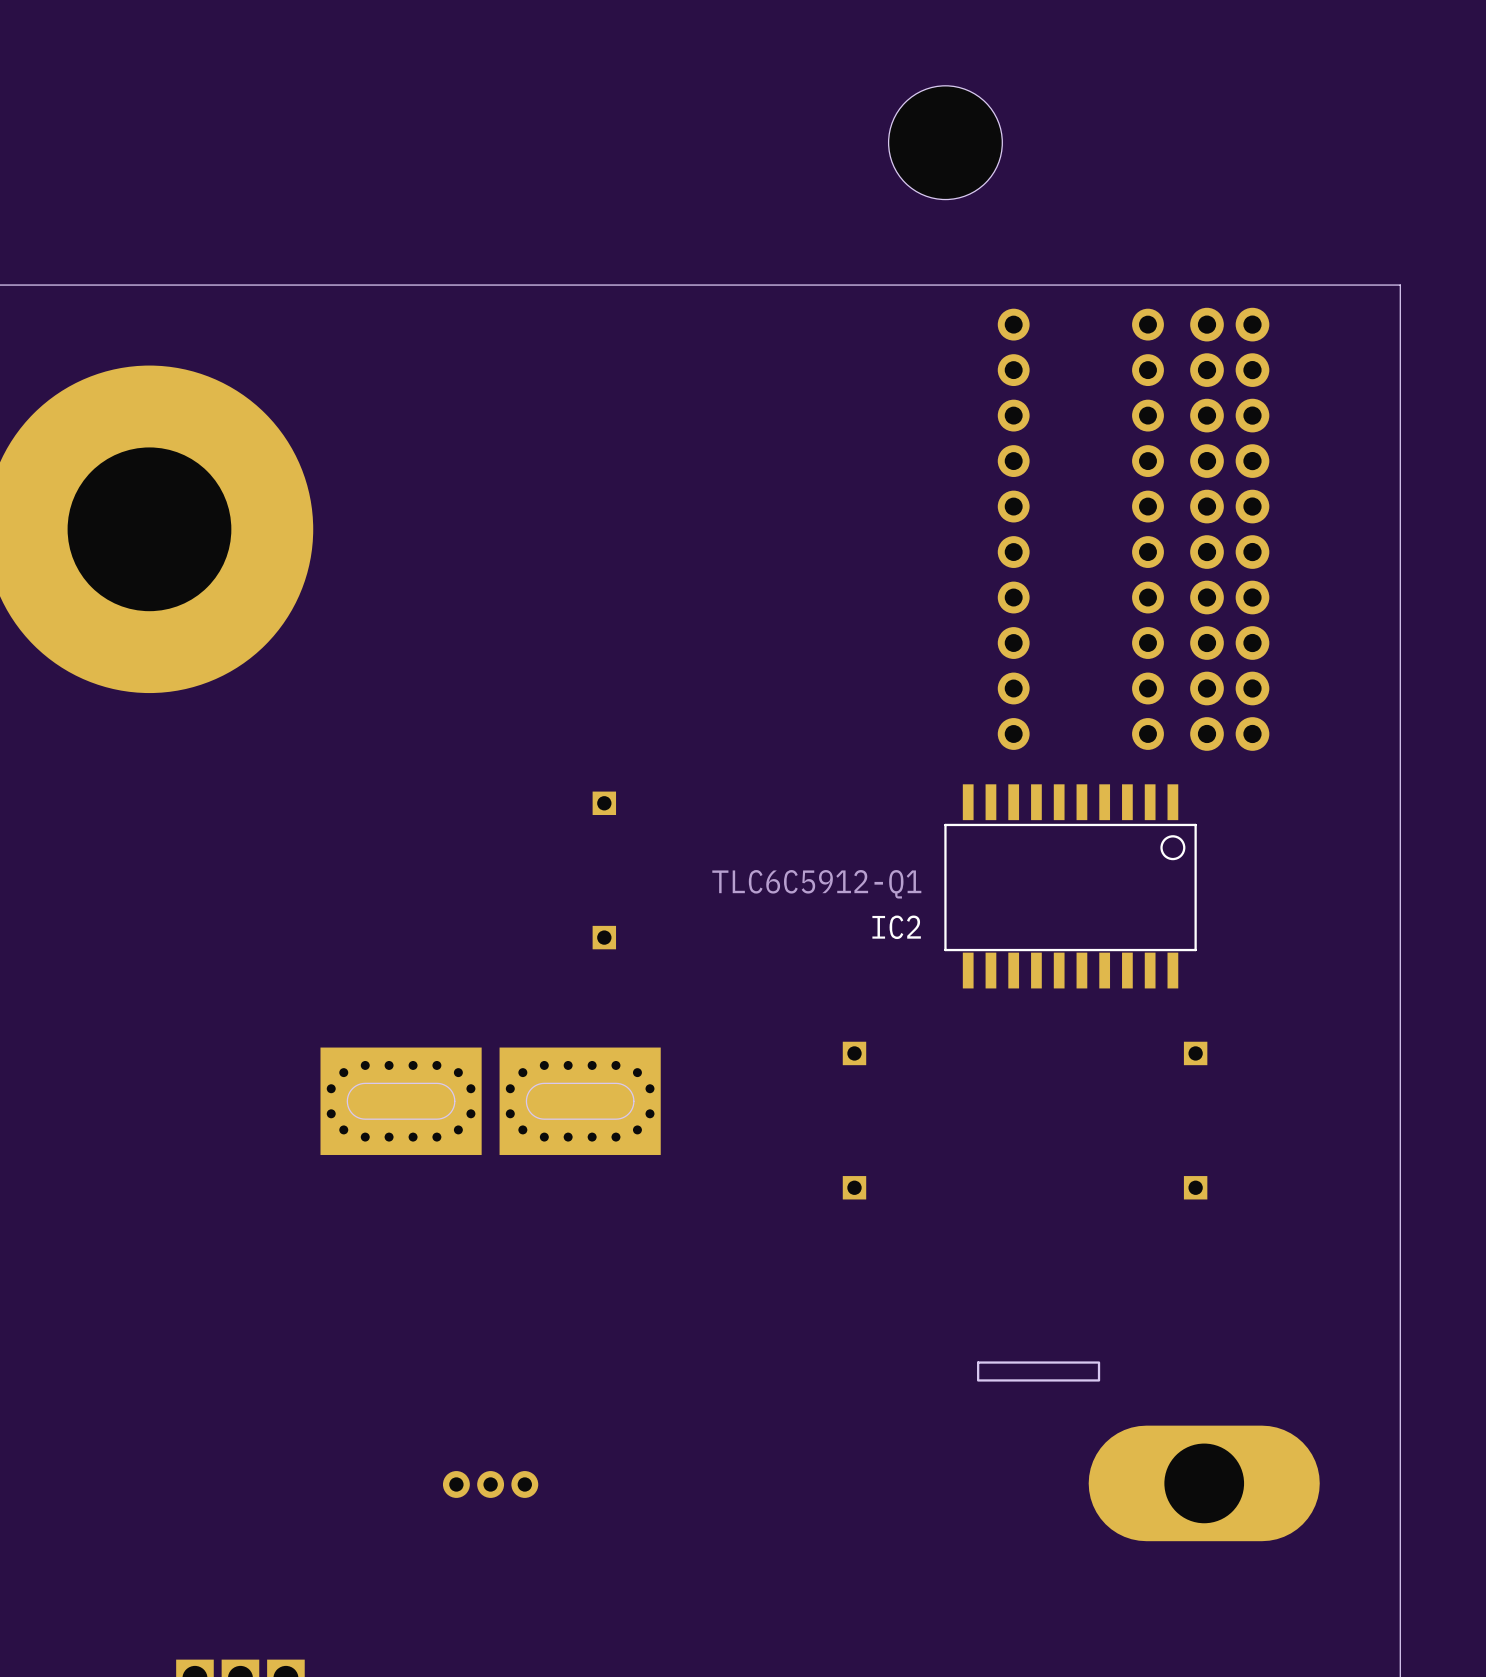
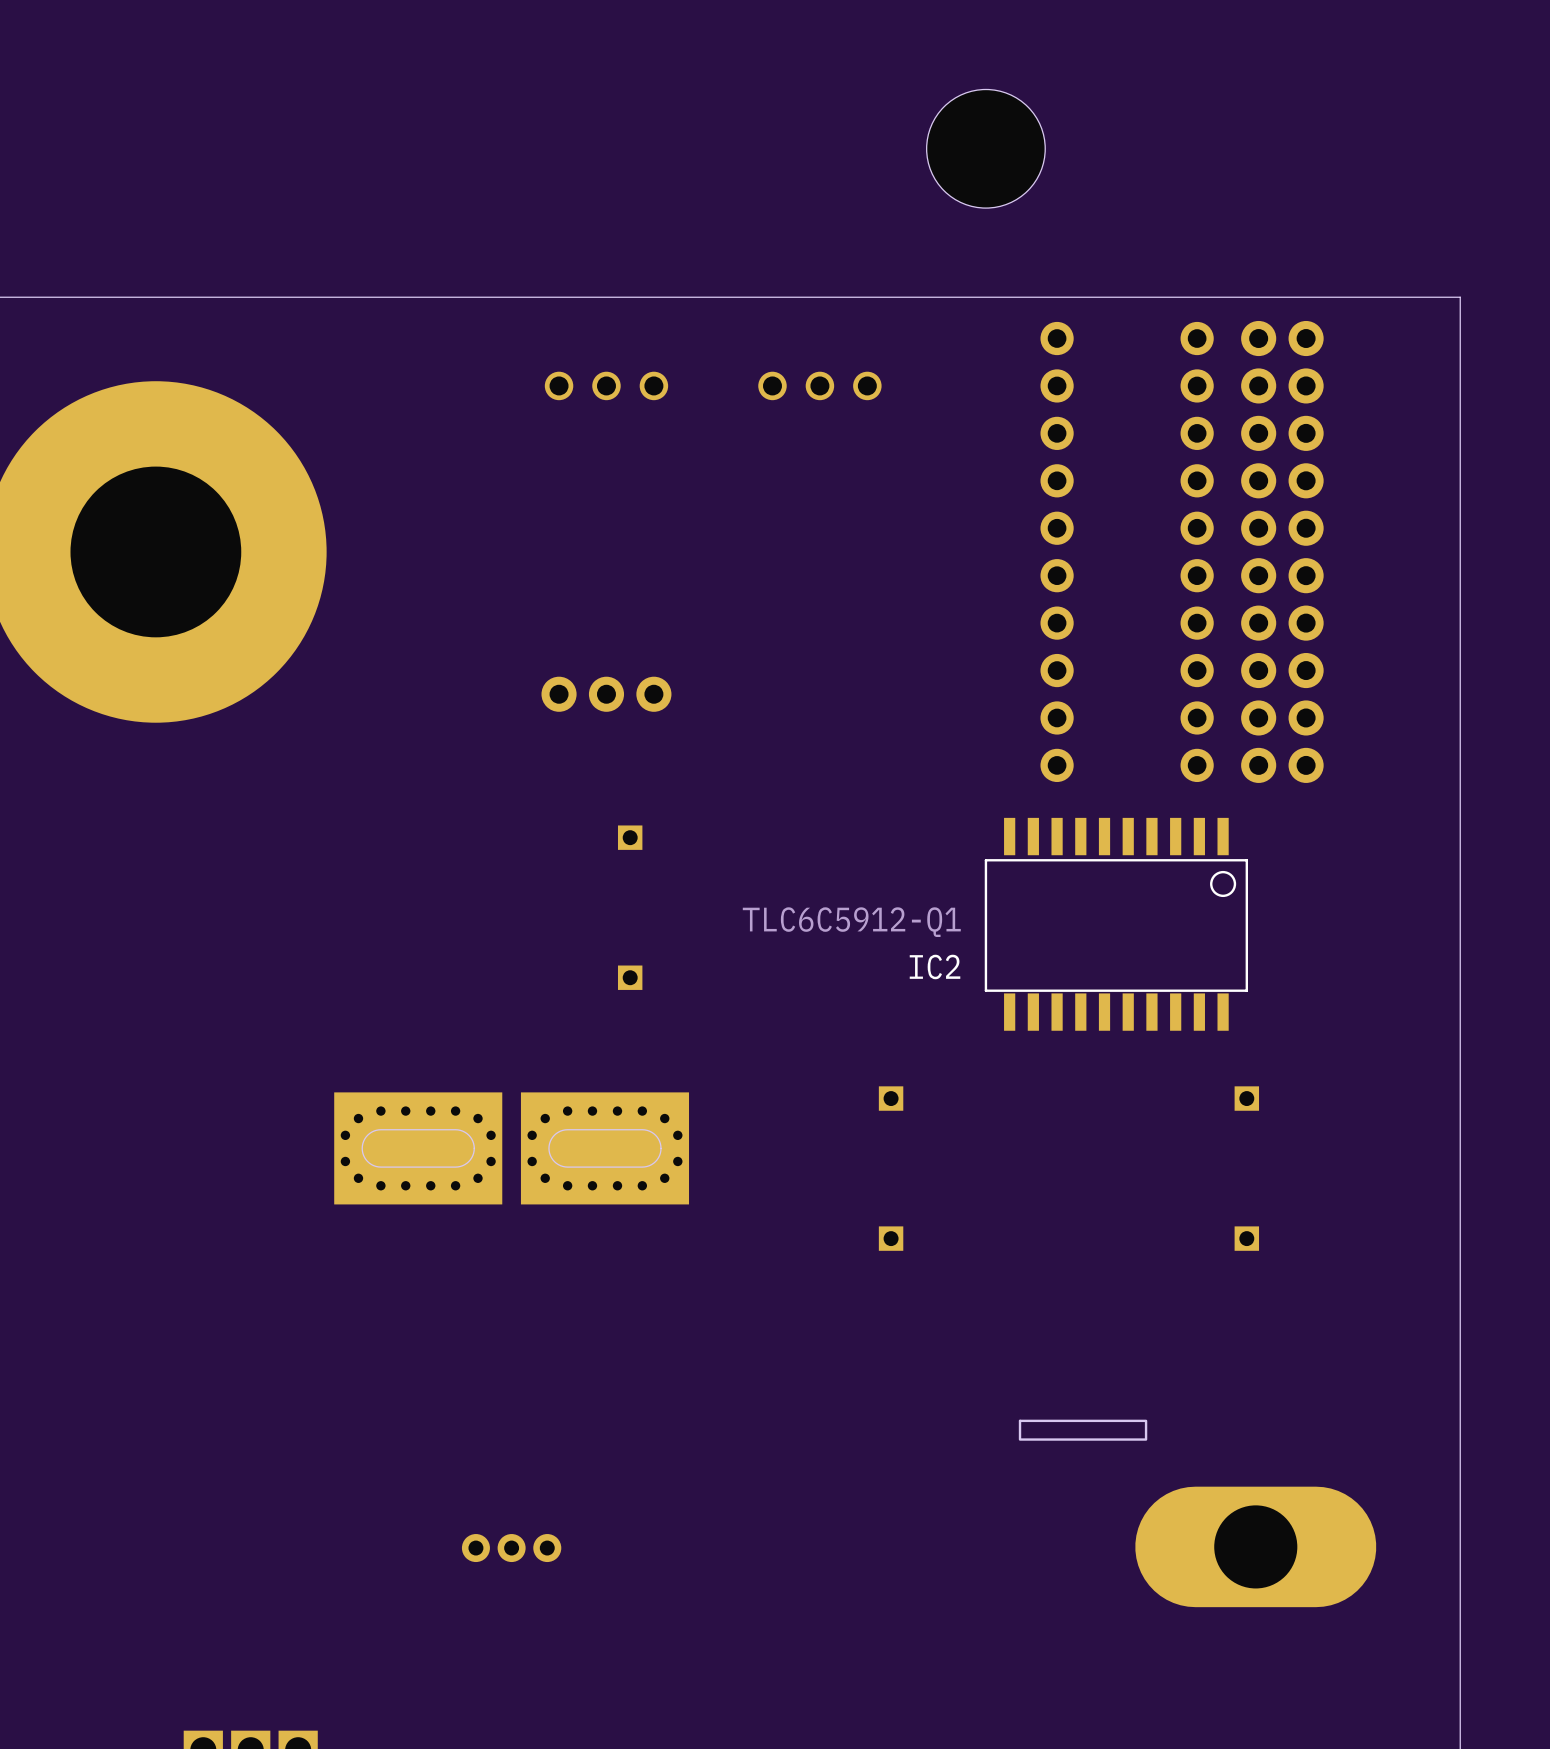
part: none -> (606, 385)
part: none -> (819, 385)
part: none -> (606, 694)

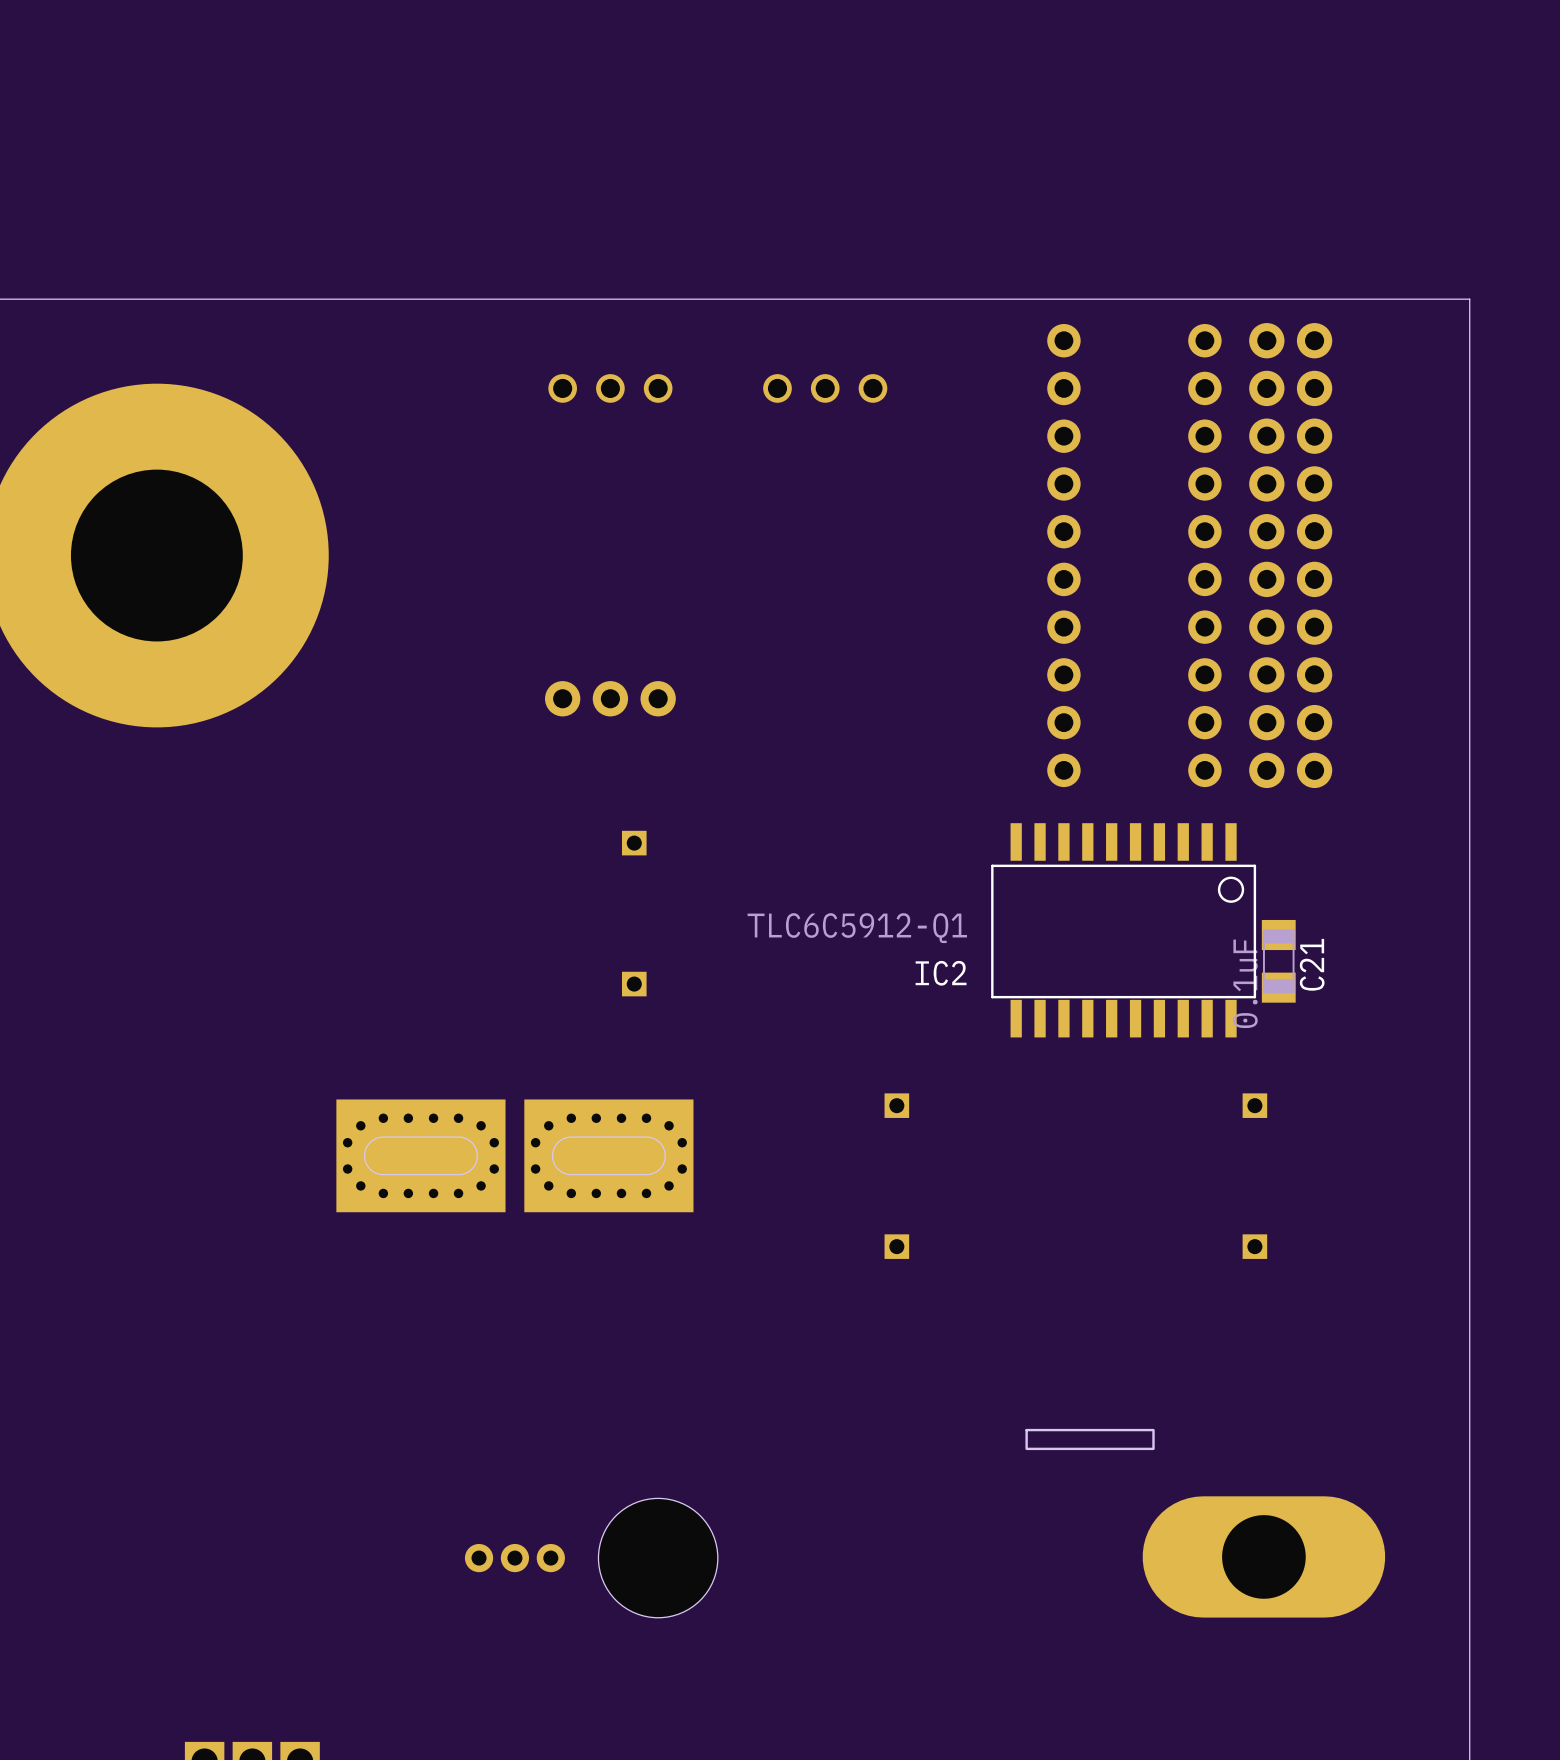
hole: (985, 148) -> none
C21: none -> 0.1uF (1278, 961)
hole: none -> (658, 1558)

